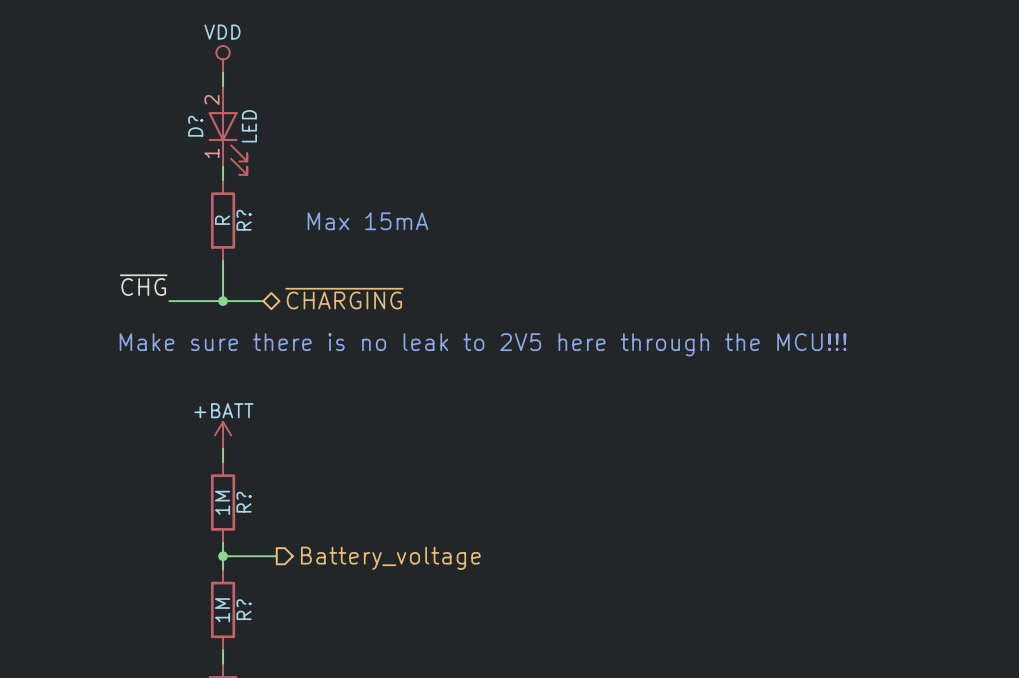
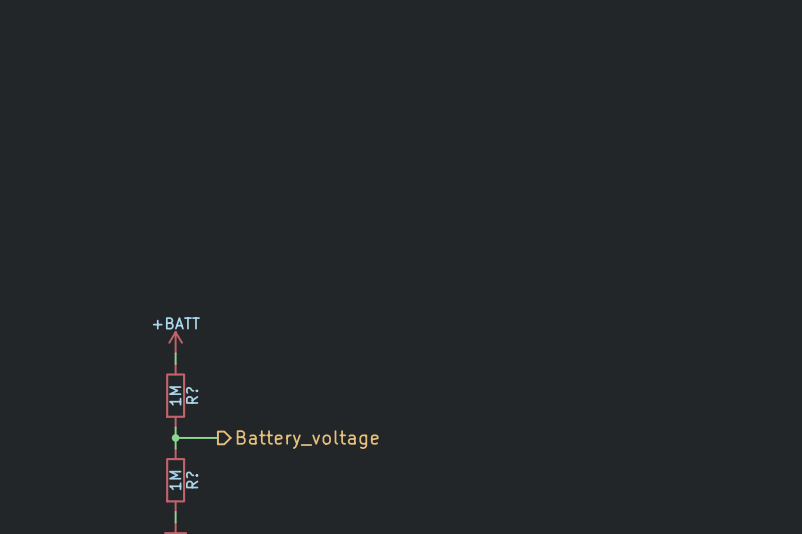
power symbol: VDD (223, 59) -> none
wire: (223, 72) (223, 86) -> none
D?: LED (227, 130) -> none
wire: (223, 166) (223, 180) -> none
R?: R (223, 220) -> none
text: Max 15mA (367, 221) -> none
wire: (223, 260) (223, 301) -> none
label: ~{CHG} (143, 285) -> none
hierarchical label: ~{CHARGING} (344, 298) -> none
wire: (169, 301) (263, 301) -> none
junction: (223, 301) -> none
text: Make sure there is no leak to 2V5 here through the MCU!!! (483, 344) -> none

